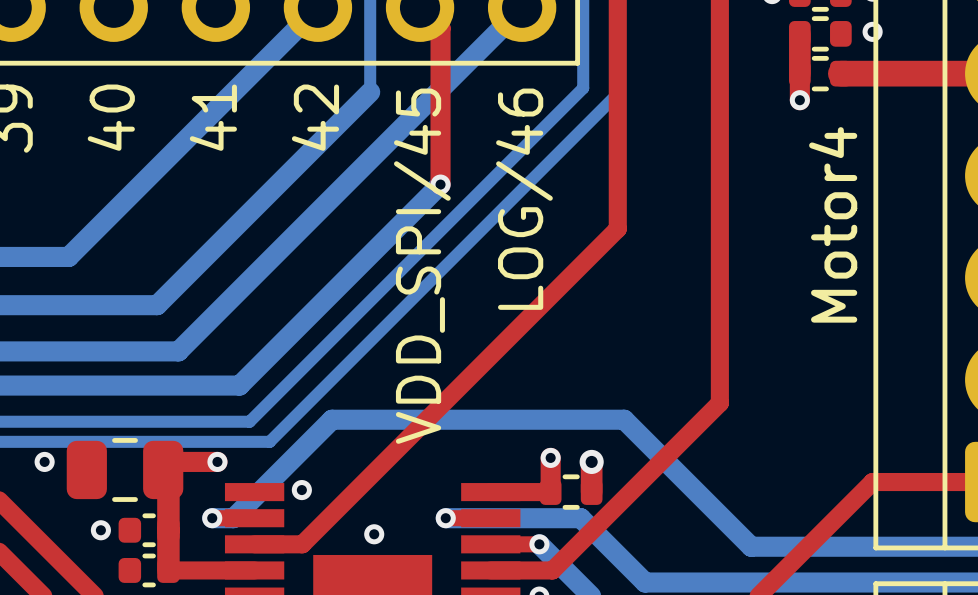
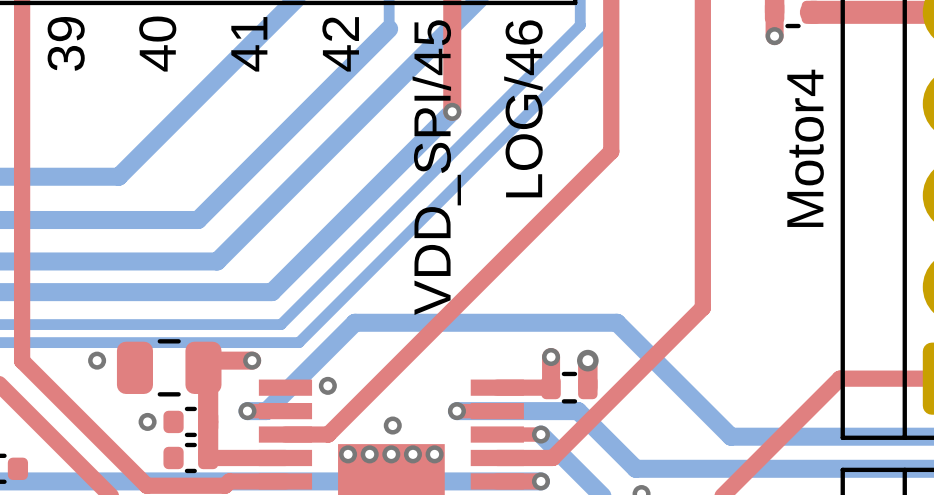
via: none -> (348, 454)
via: none -> (369, 454)
via: none -> (391, 454)
via: none -> (412, 454)
via: none -> (434, 454)

